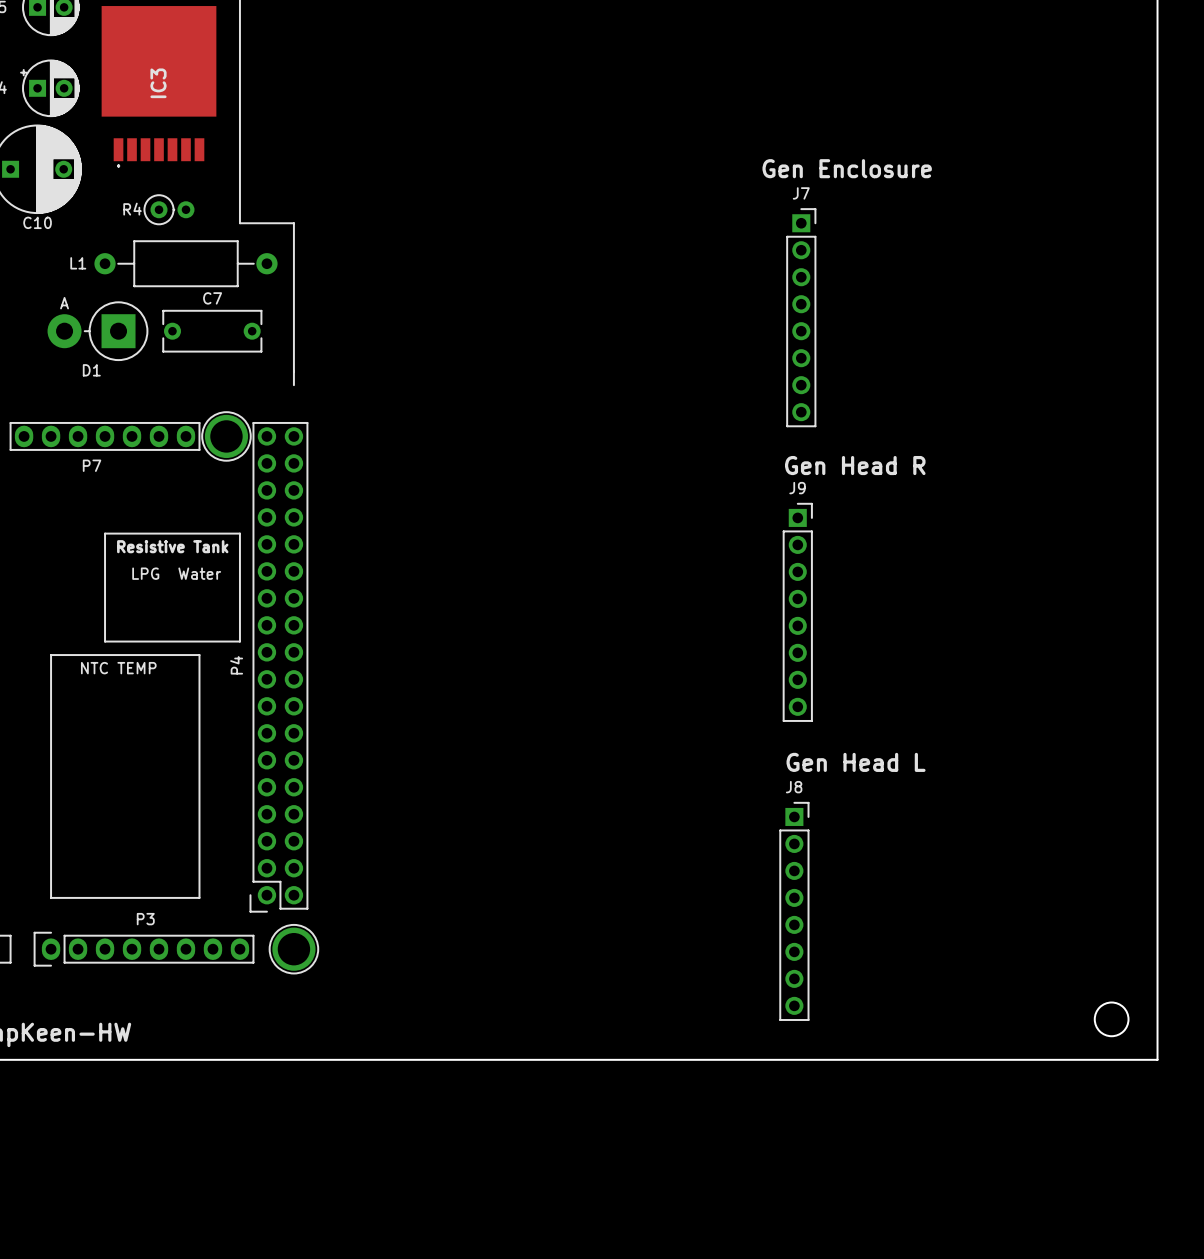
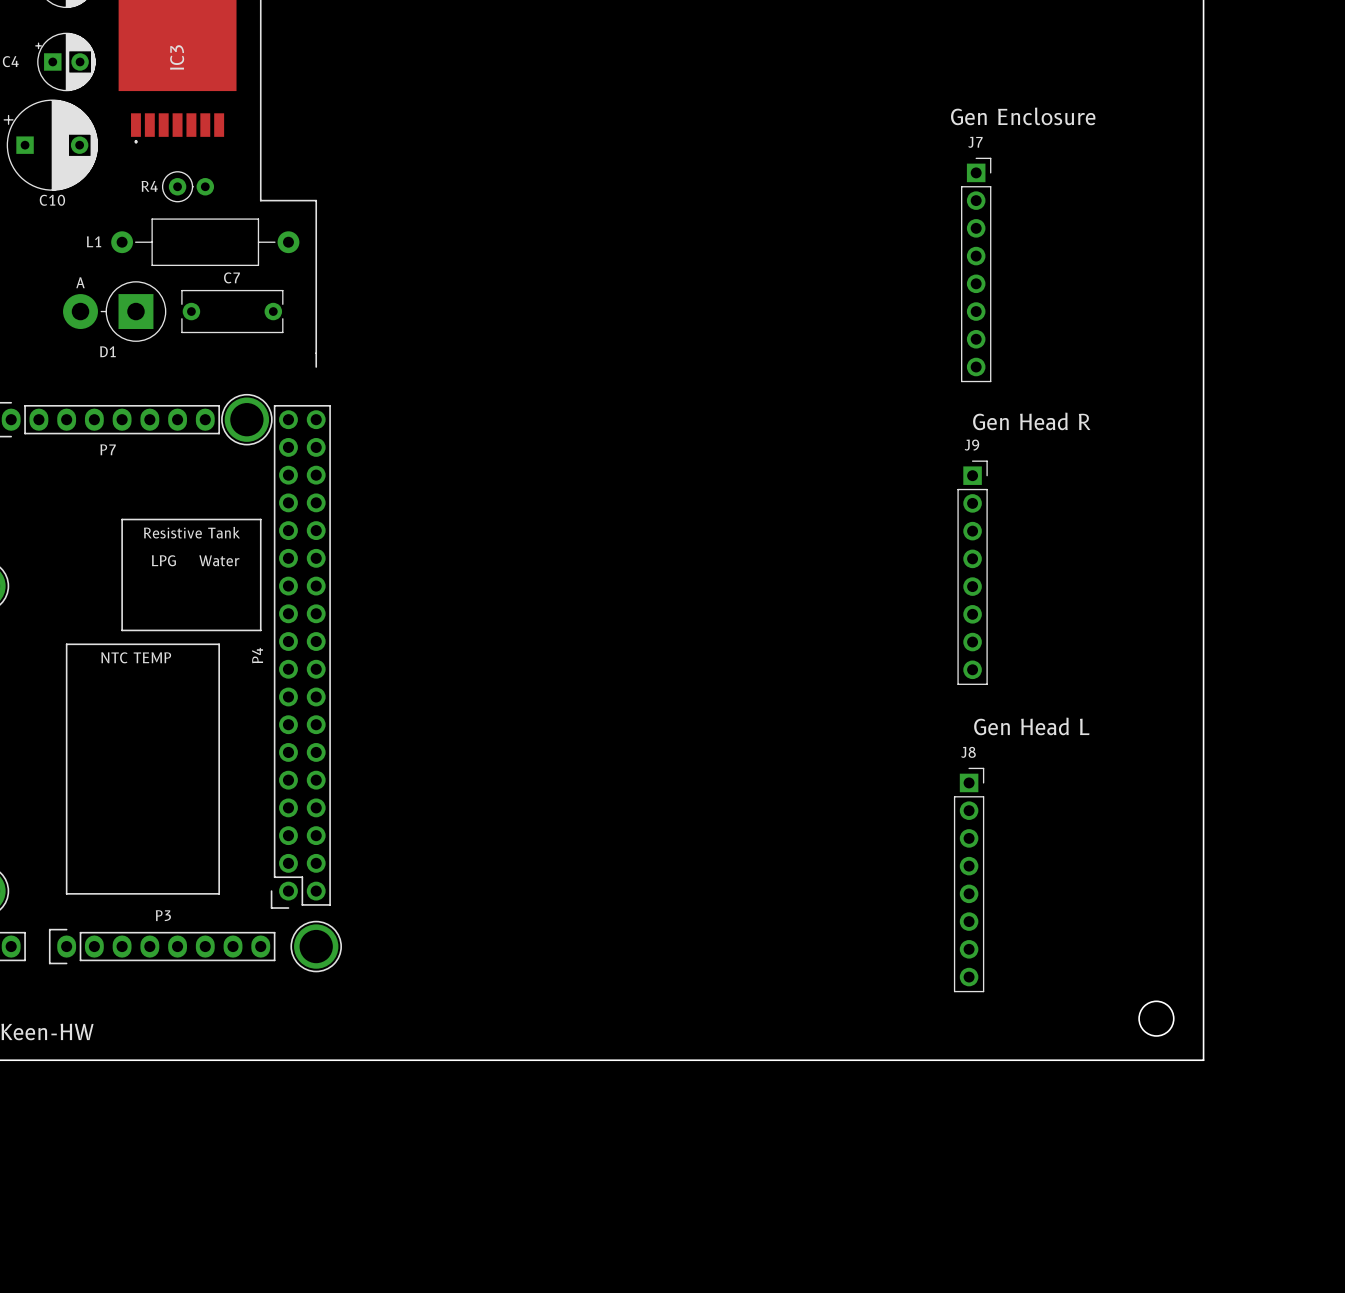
text position: Gen Enclosure (847, 168) -> Gen Enclosure (1023, 116)
J7 position: (801, 317) -> (976, 269)
text position: Gen Head R (855, 465) -> Gen Head R (1031, 421)
J9 position: (797, 612) -> (972, 572)
text position: Gen Head L (856, 762) -> Gen Head L (1031, 726)
J8 position: (794, 911) -> (969, 879)

